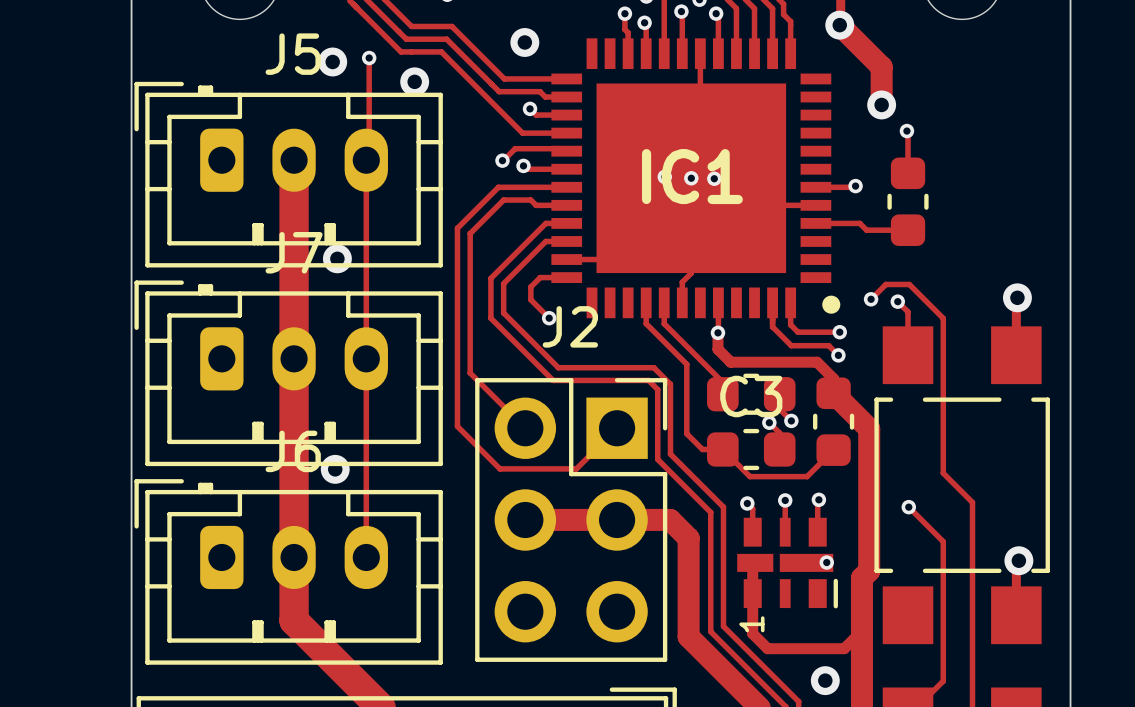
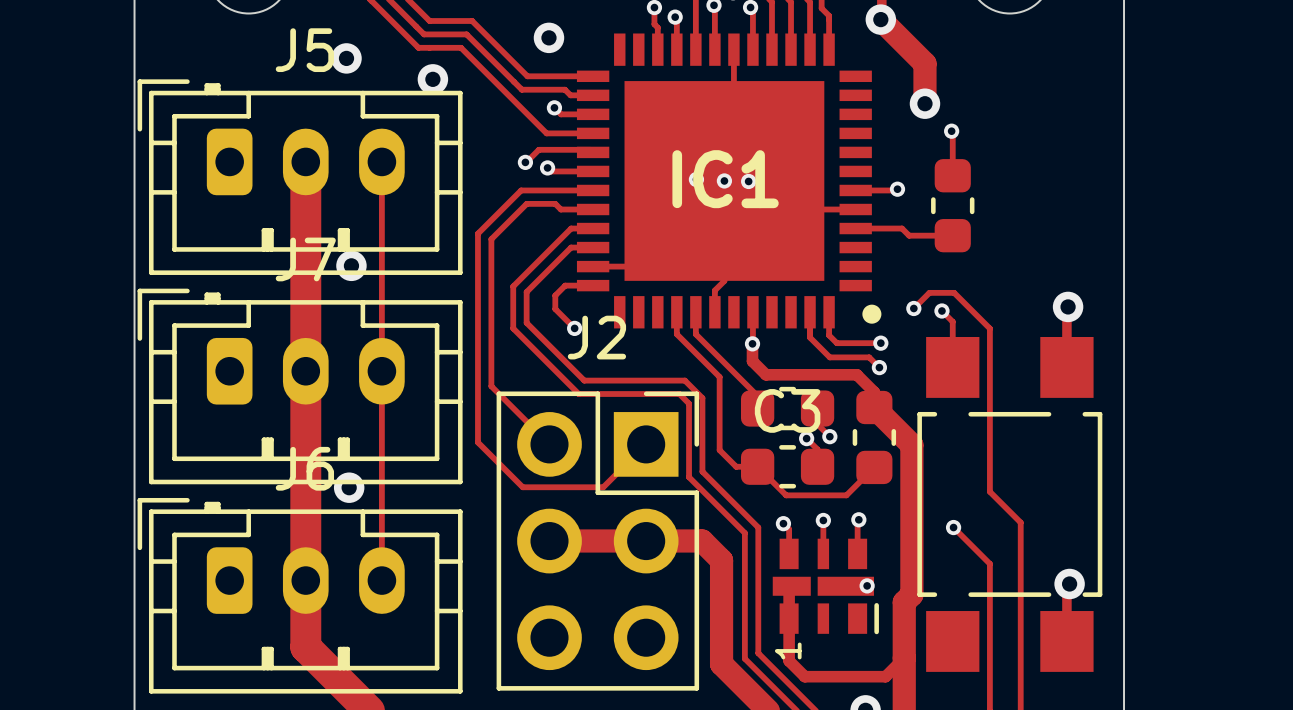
track: (369, 58) (369, 157) (366, 160) -> none
via: (369, 58) -> none

